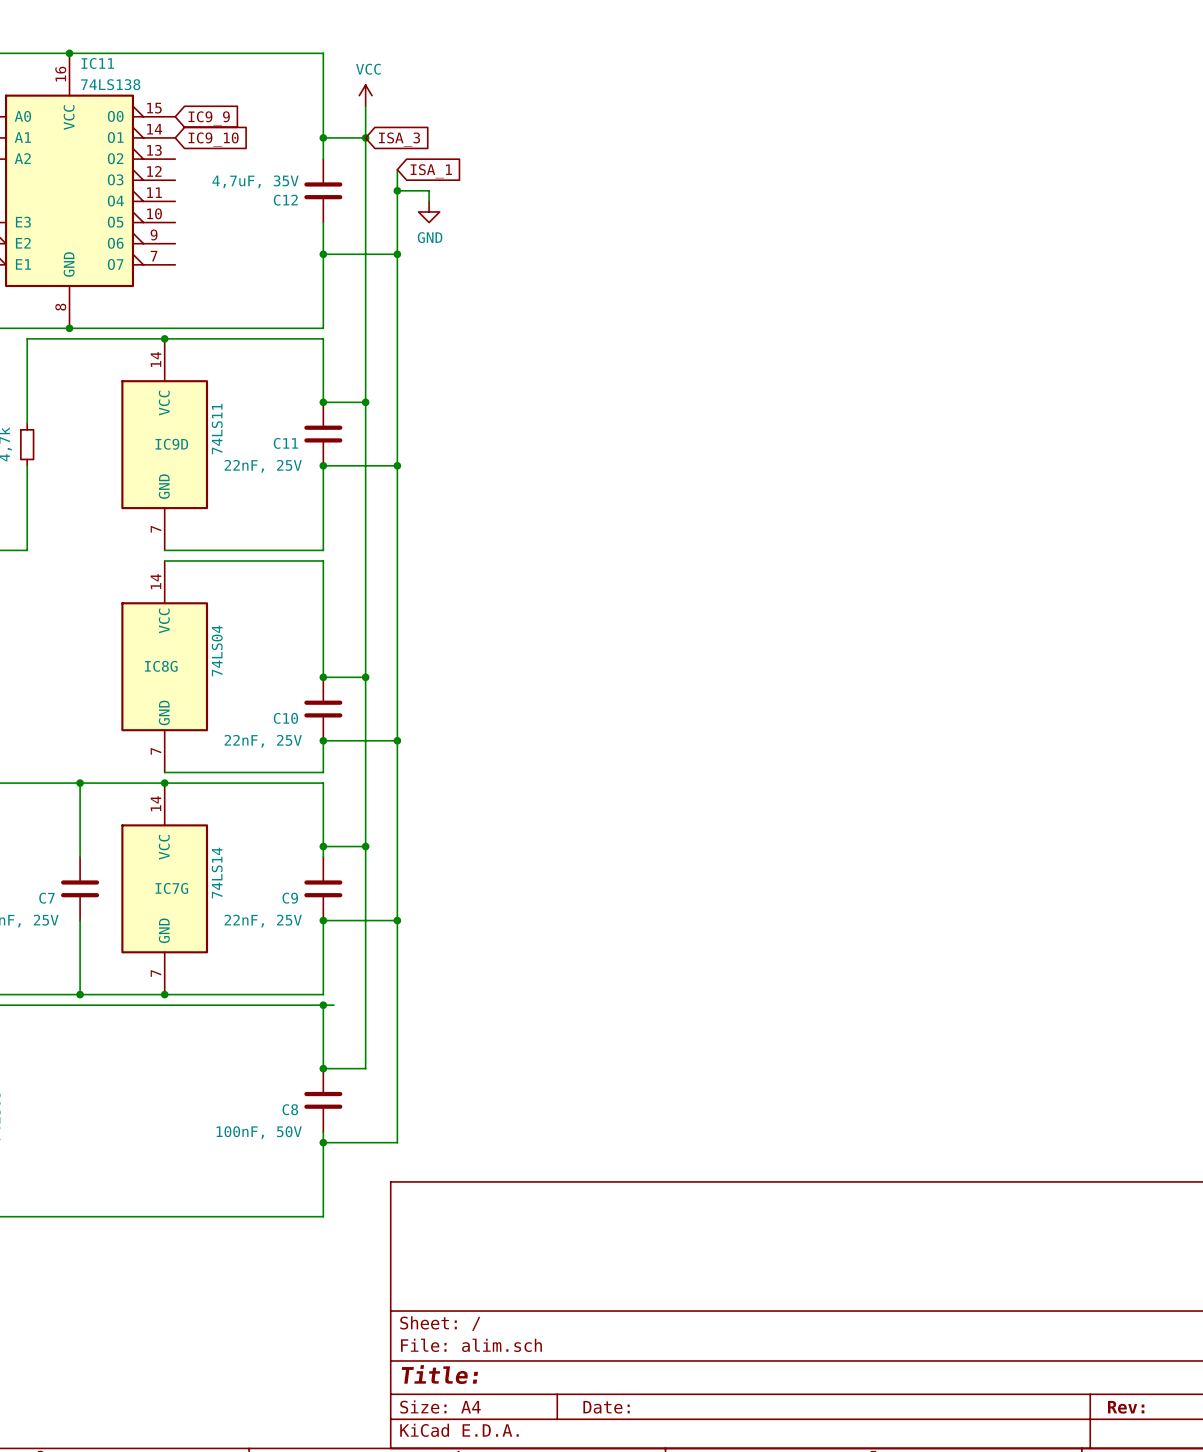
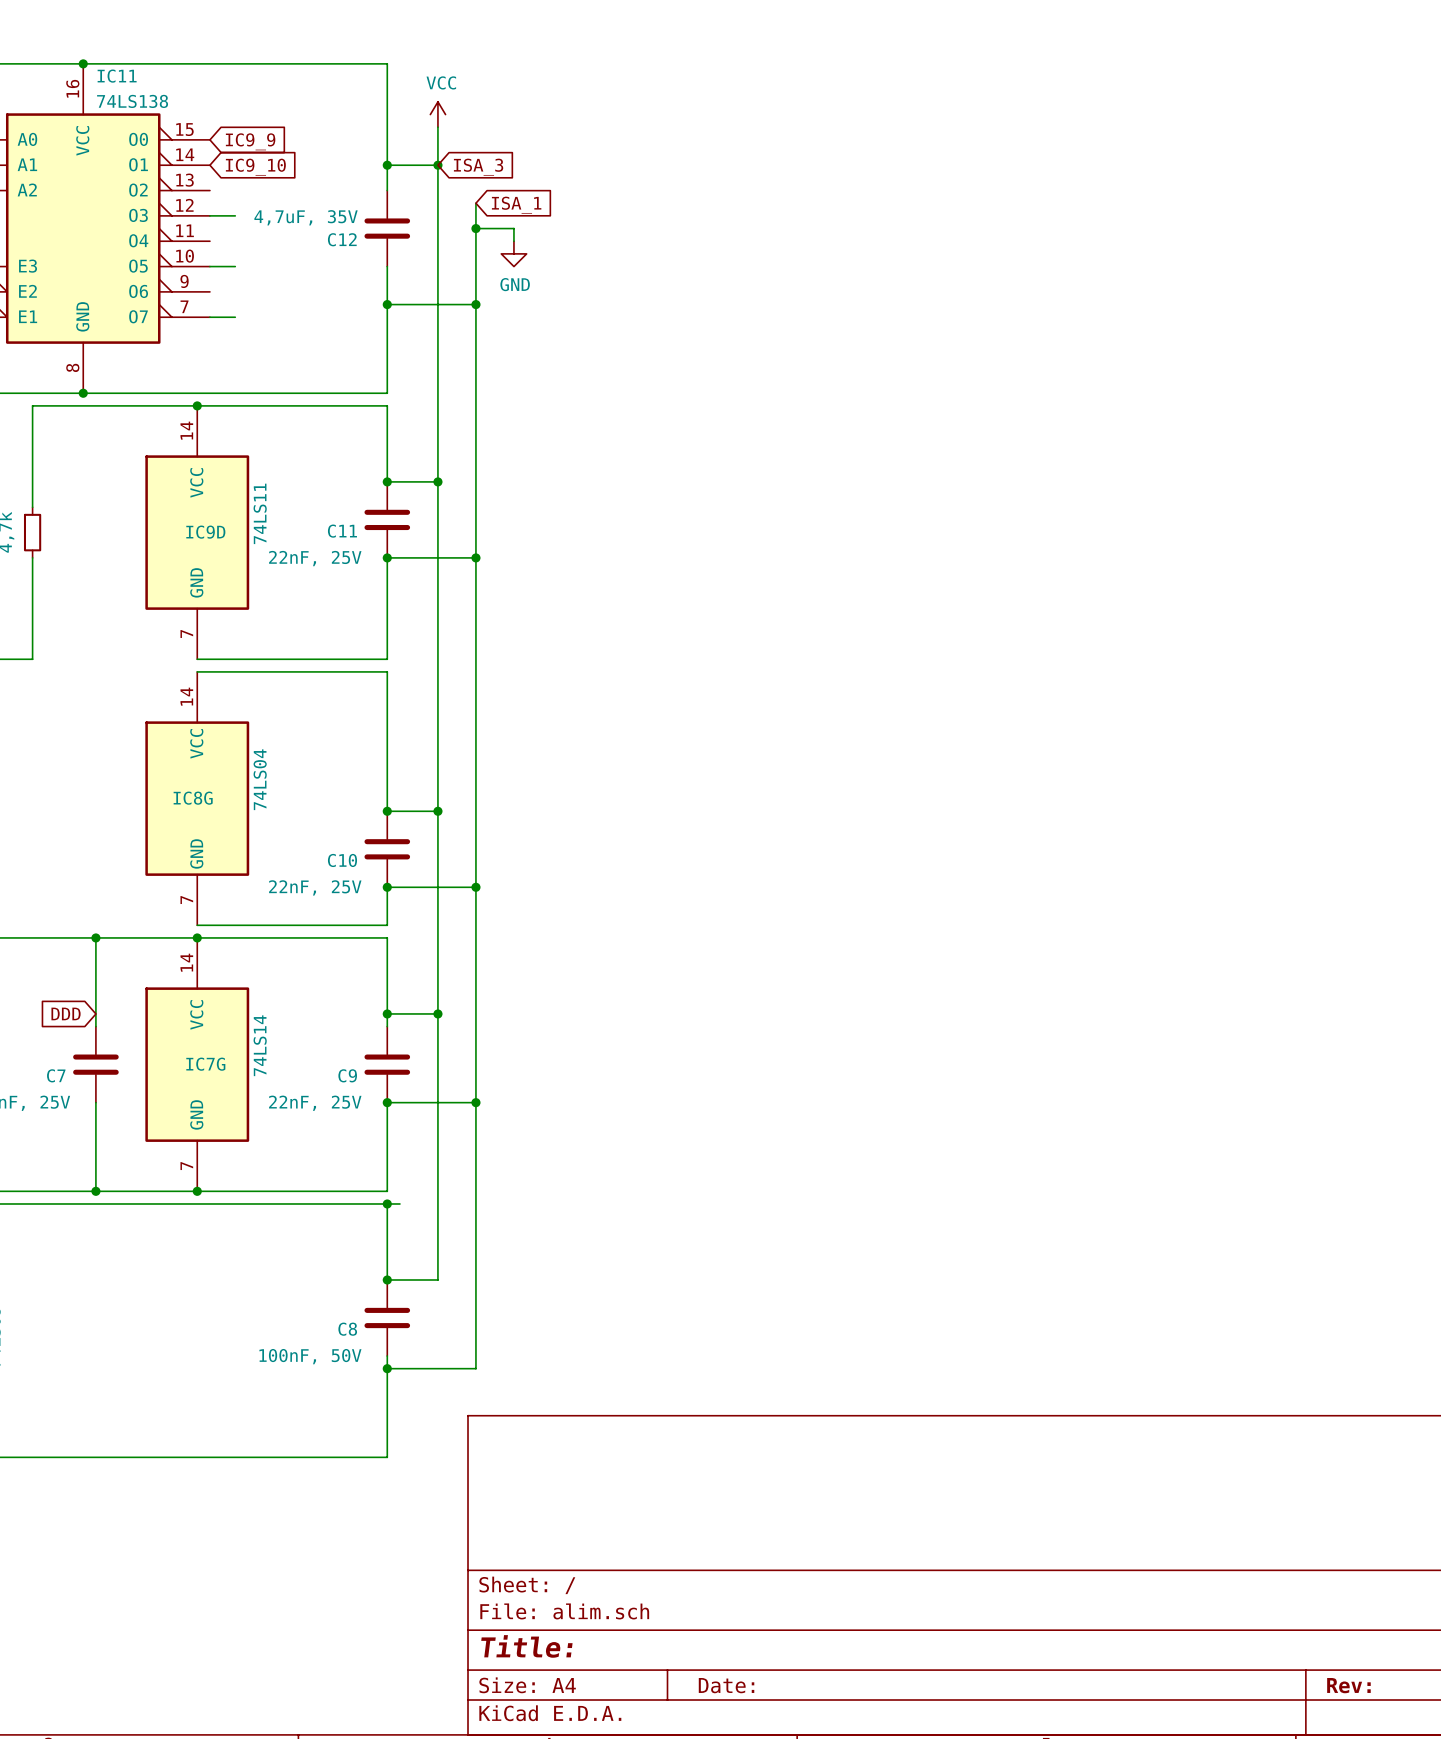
wire: none -> (209, 215) (235, 215)
wire: none -> (209, 266) (235, 266)
wire: none -> (209, 317) (235, 317)
global label: none -> DDD (66, 1013)

